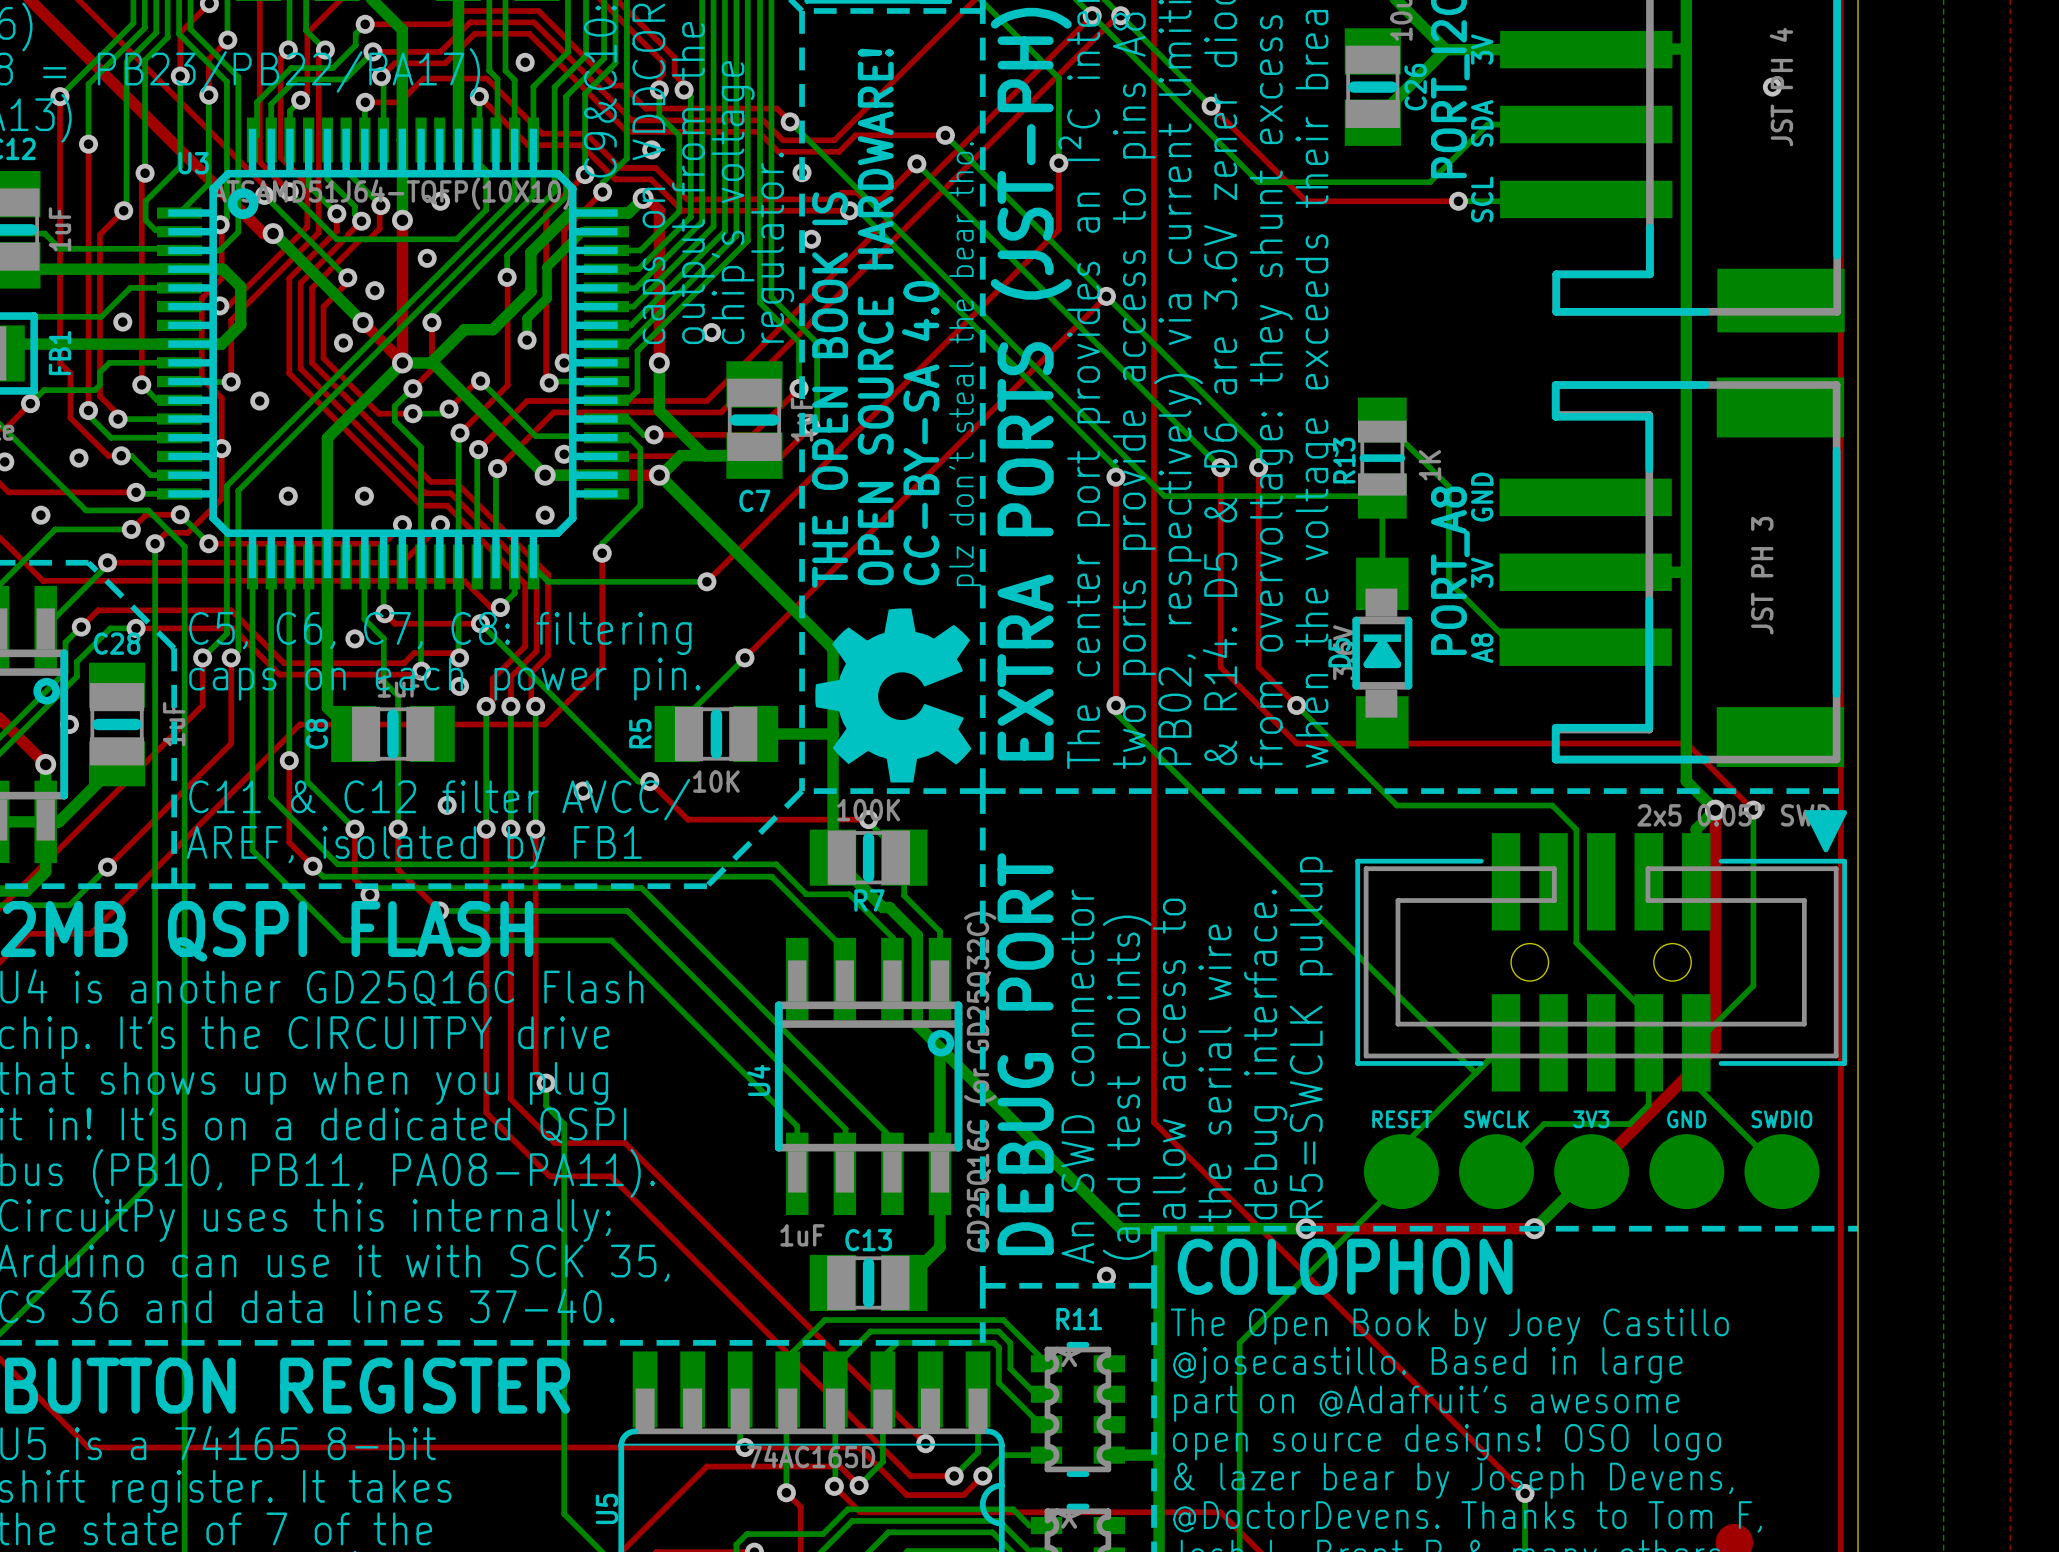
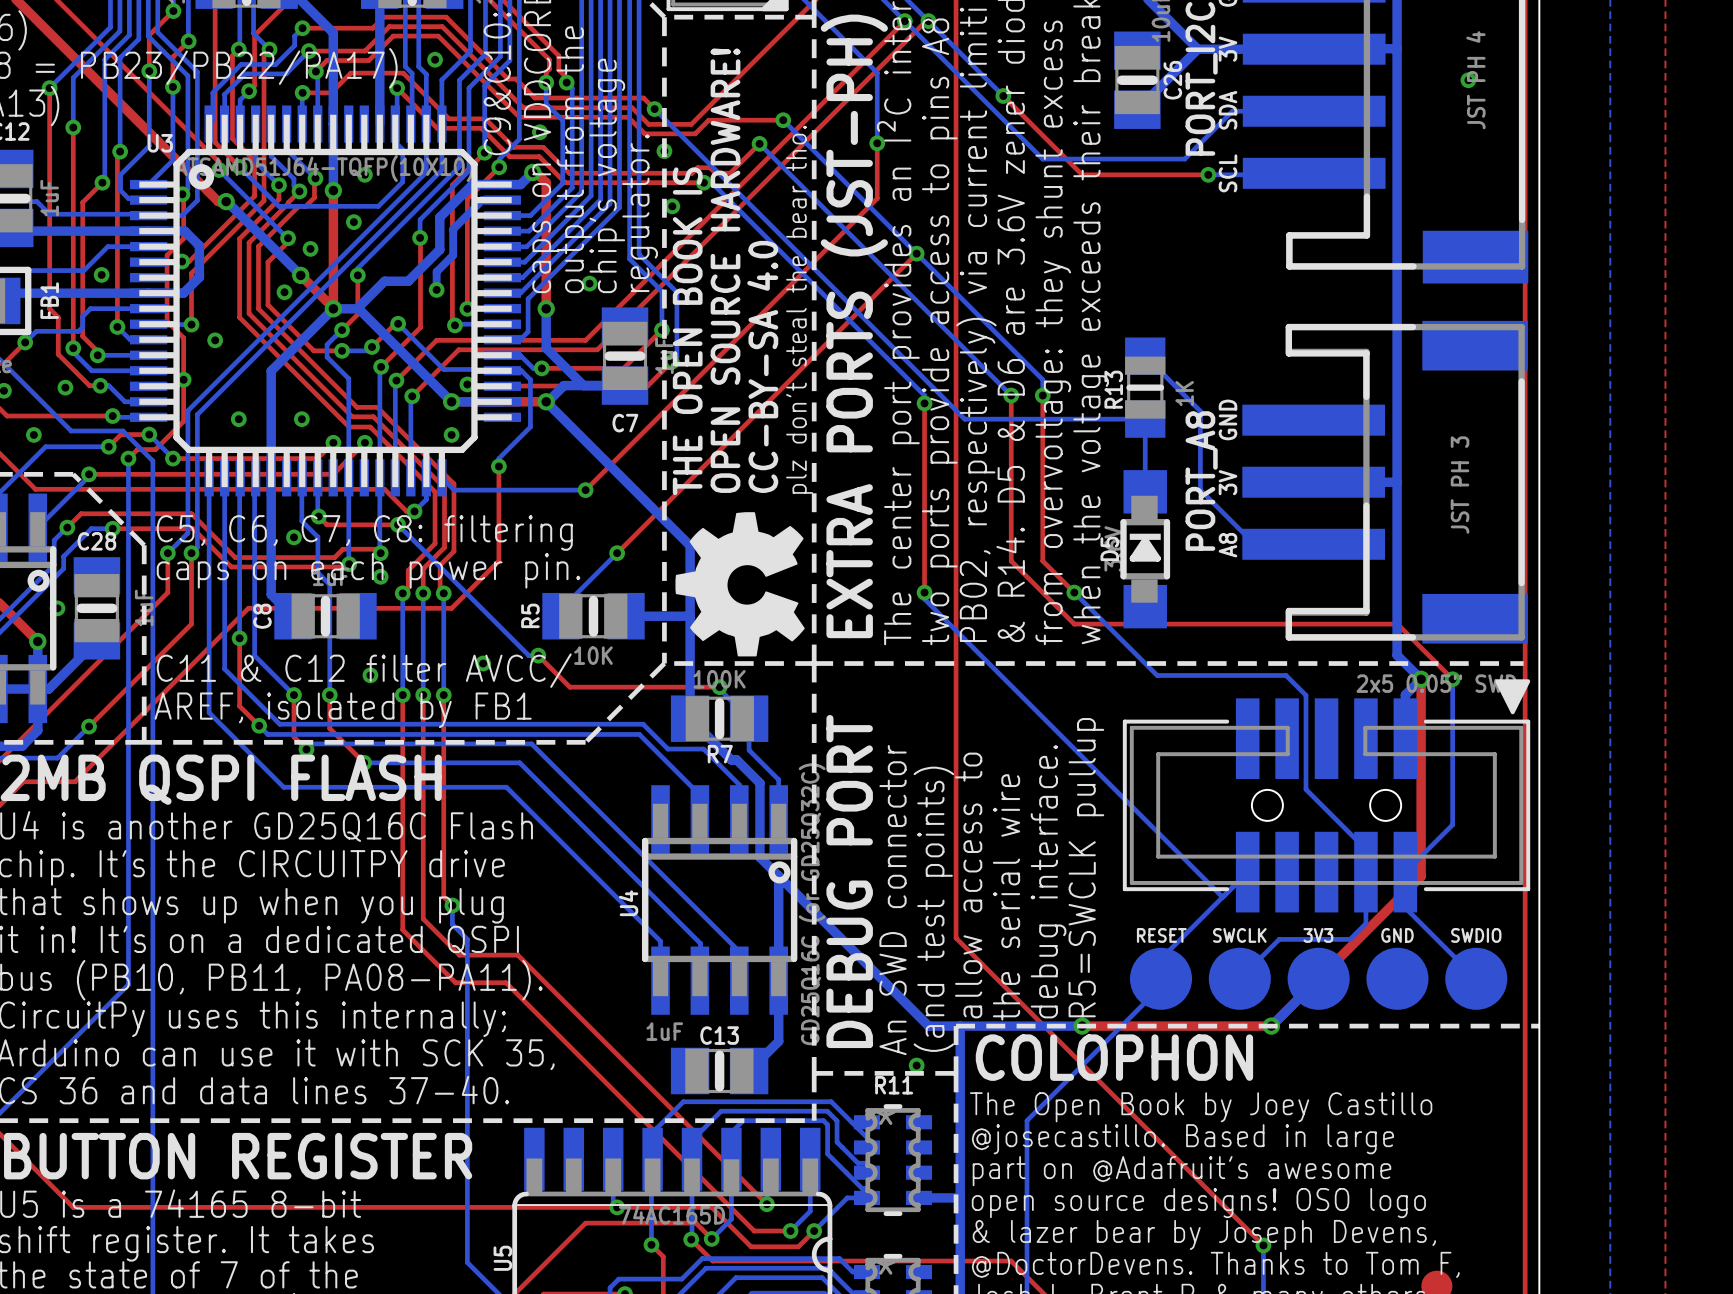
R11 position: (1077, 1409) -> (893, 1160)
bottom track: (1046, 1455) (1003, 1455) -> (867, 1197) (847, 1197) (831, 1213)
bottom track: (1159, 1455) (1109, 1455) -> (960, 1197) (919, 1197)

